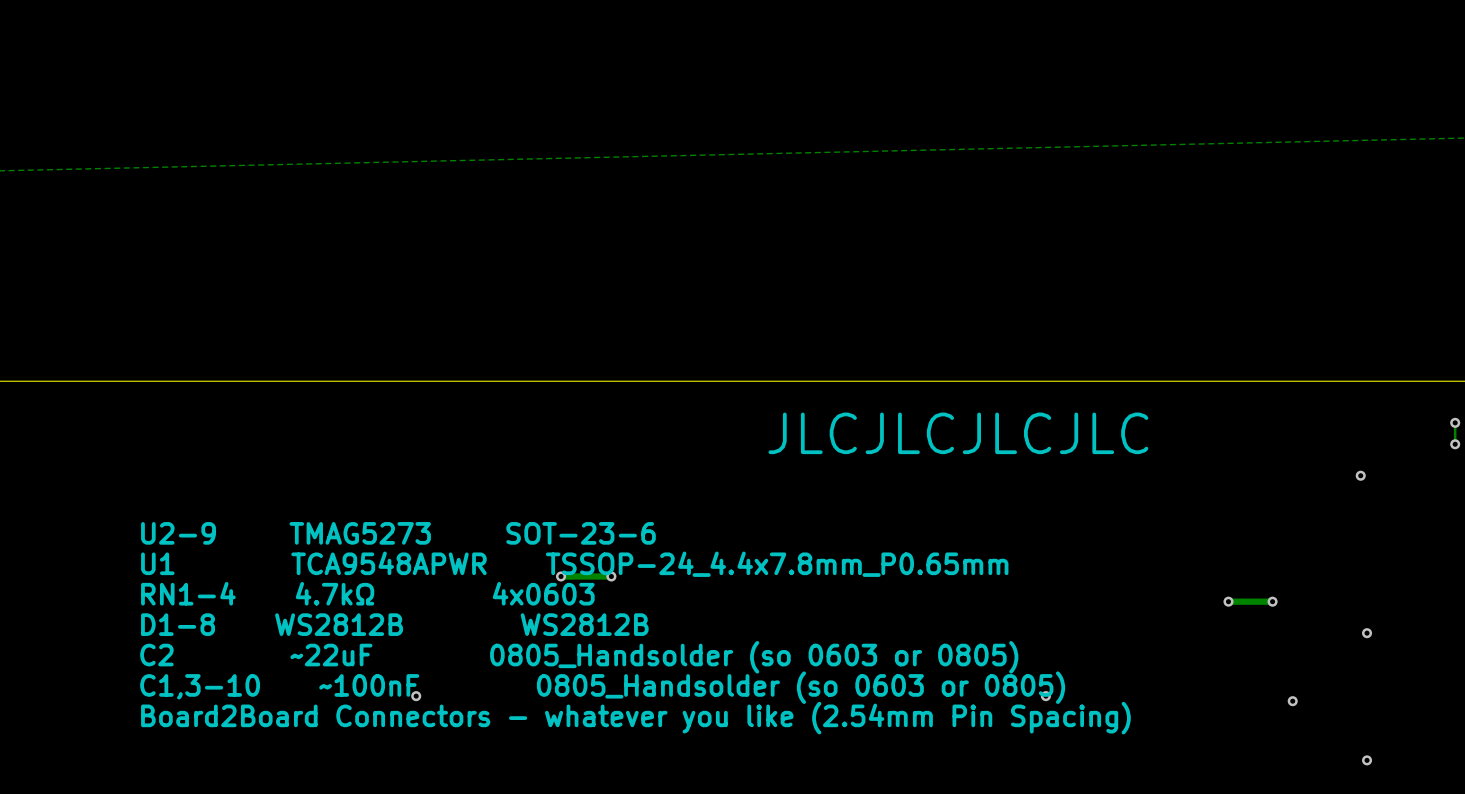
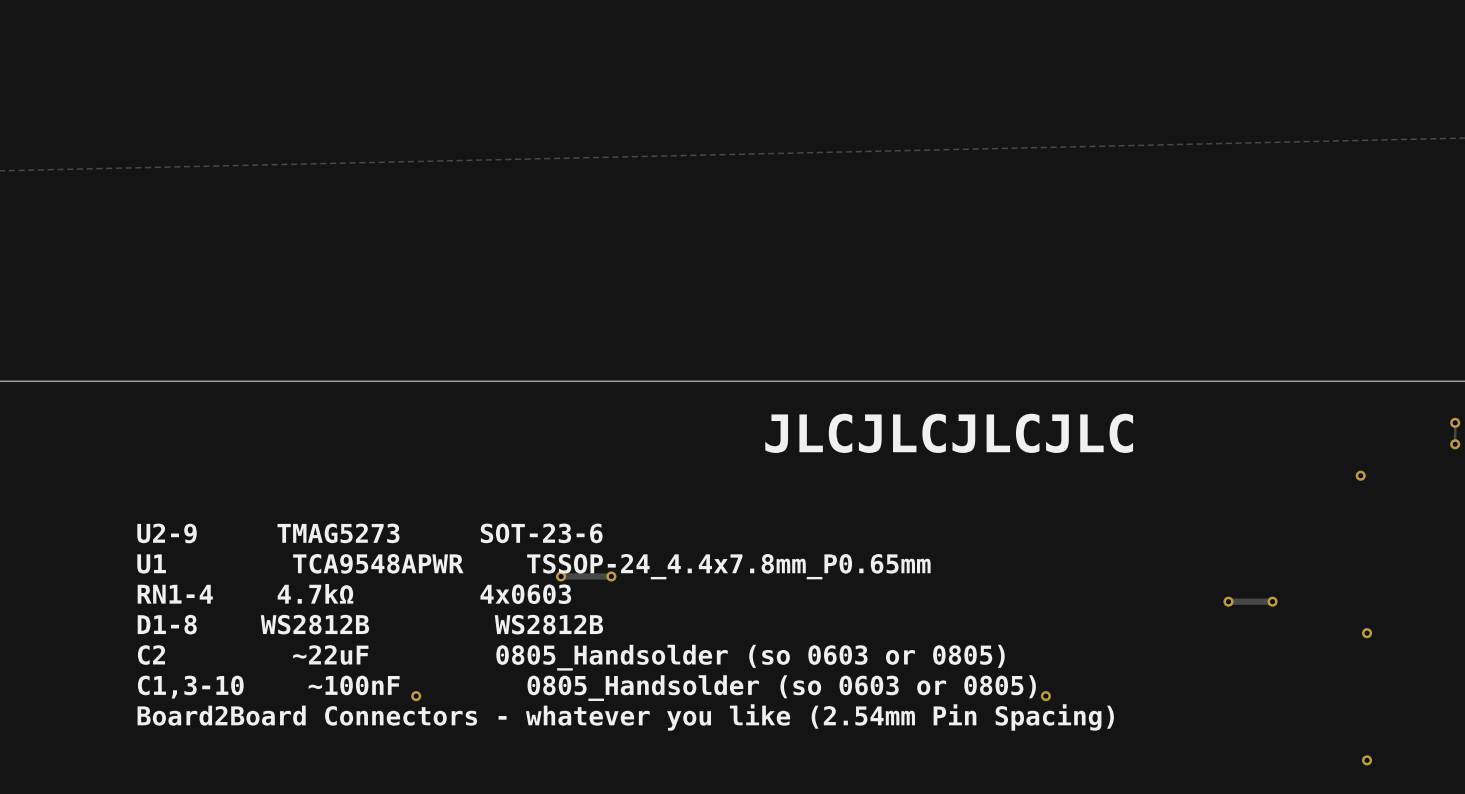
via: (1292, 701) -> none

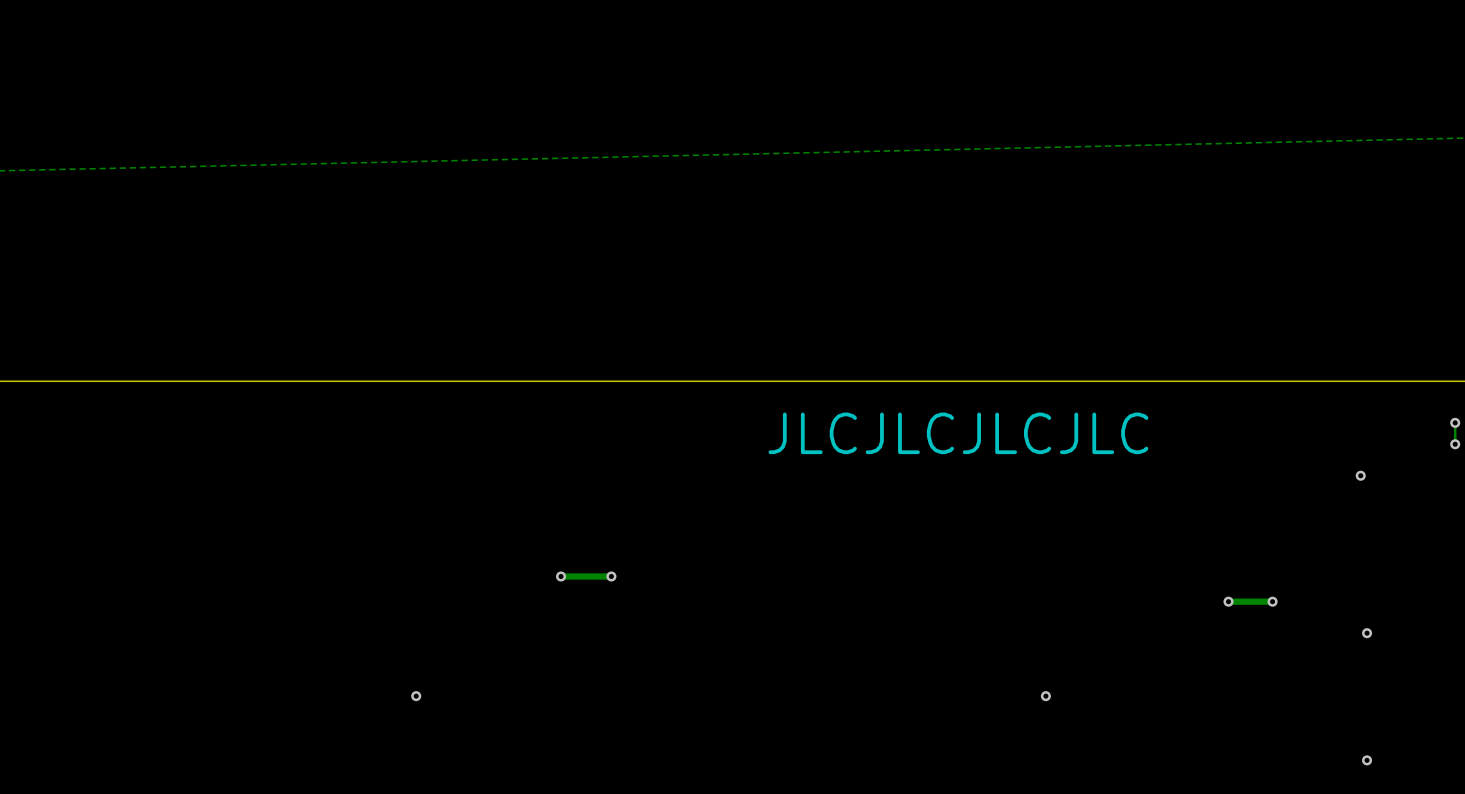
text: U2-9 TMAG5273 SOT-23-6 (369, 533) -> none
text: U1 TCA9548APWR TSSOP-24_4.4x7.8mm_P0.65mm (533, 566) -> none
text: RN1-4 4.7kΩ 4x0603 (354, 594) -> none
text: D1-8 WS2812B WS2812B (370, 624) -> none
text: C2 ~22uF 0805_Handsolder (so 0603 or 0805) (571, 657) -> none
text: C1,3-10 ~100nF 0805_Handsolder (so 0603 or 0805) (586, 688) -> none
text: Board2Board Connectors - whatever you like (2.54mm Pin Spacing) (625, 717) -> none

